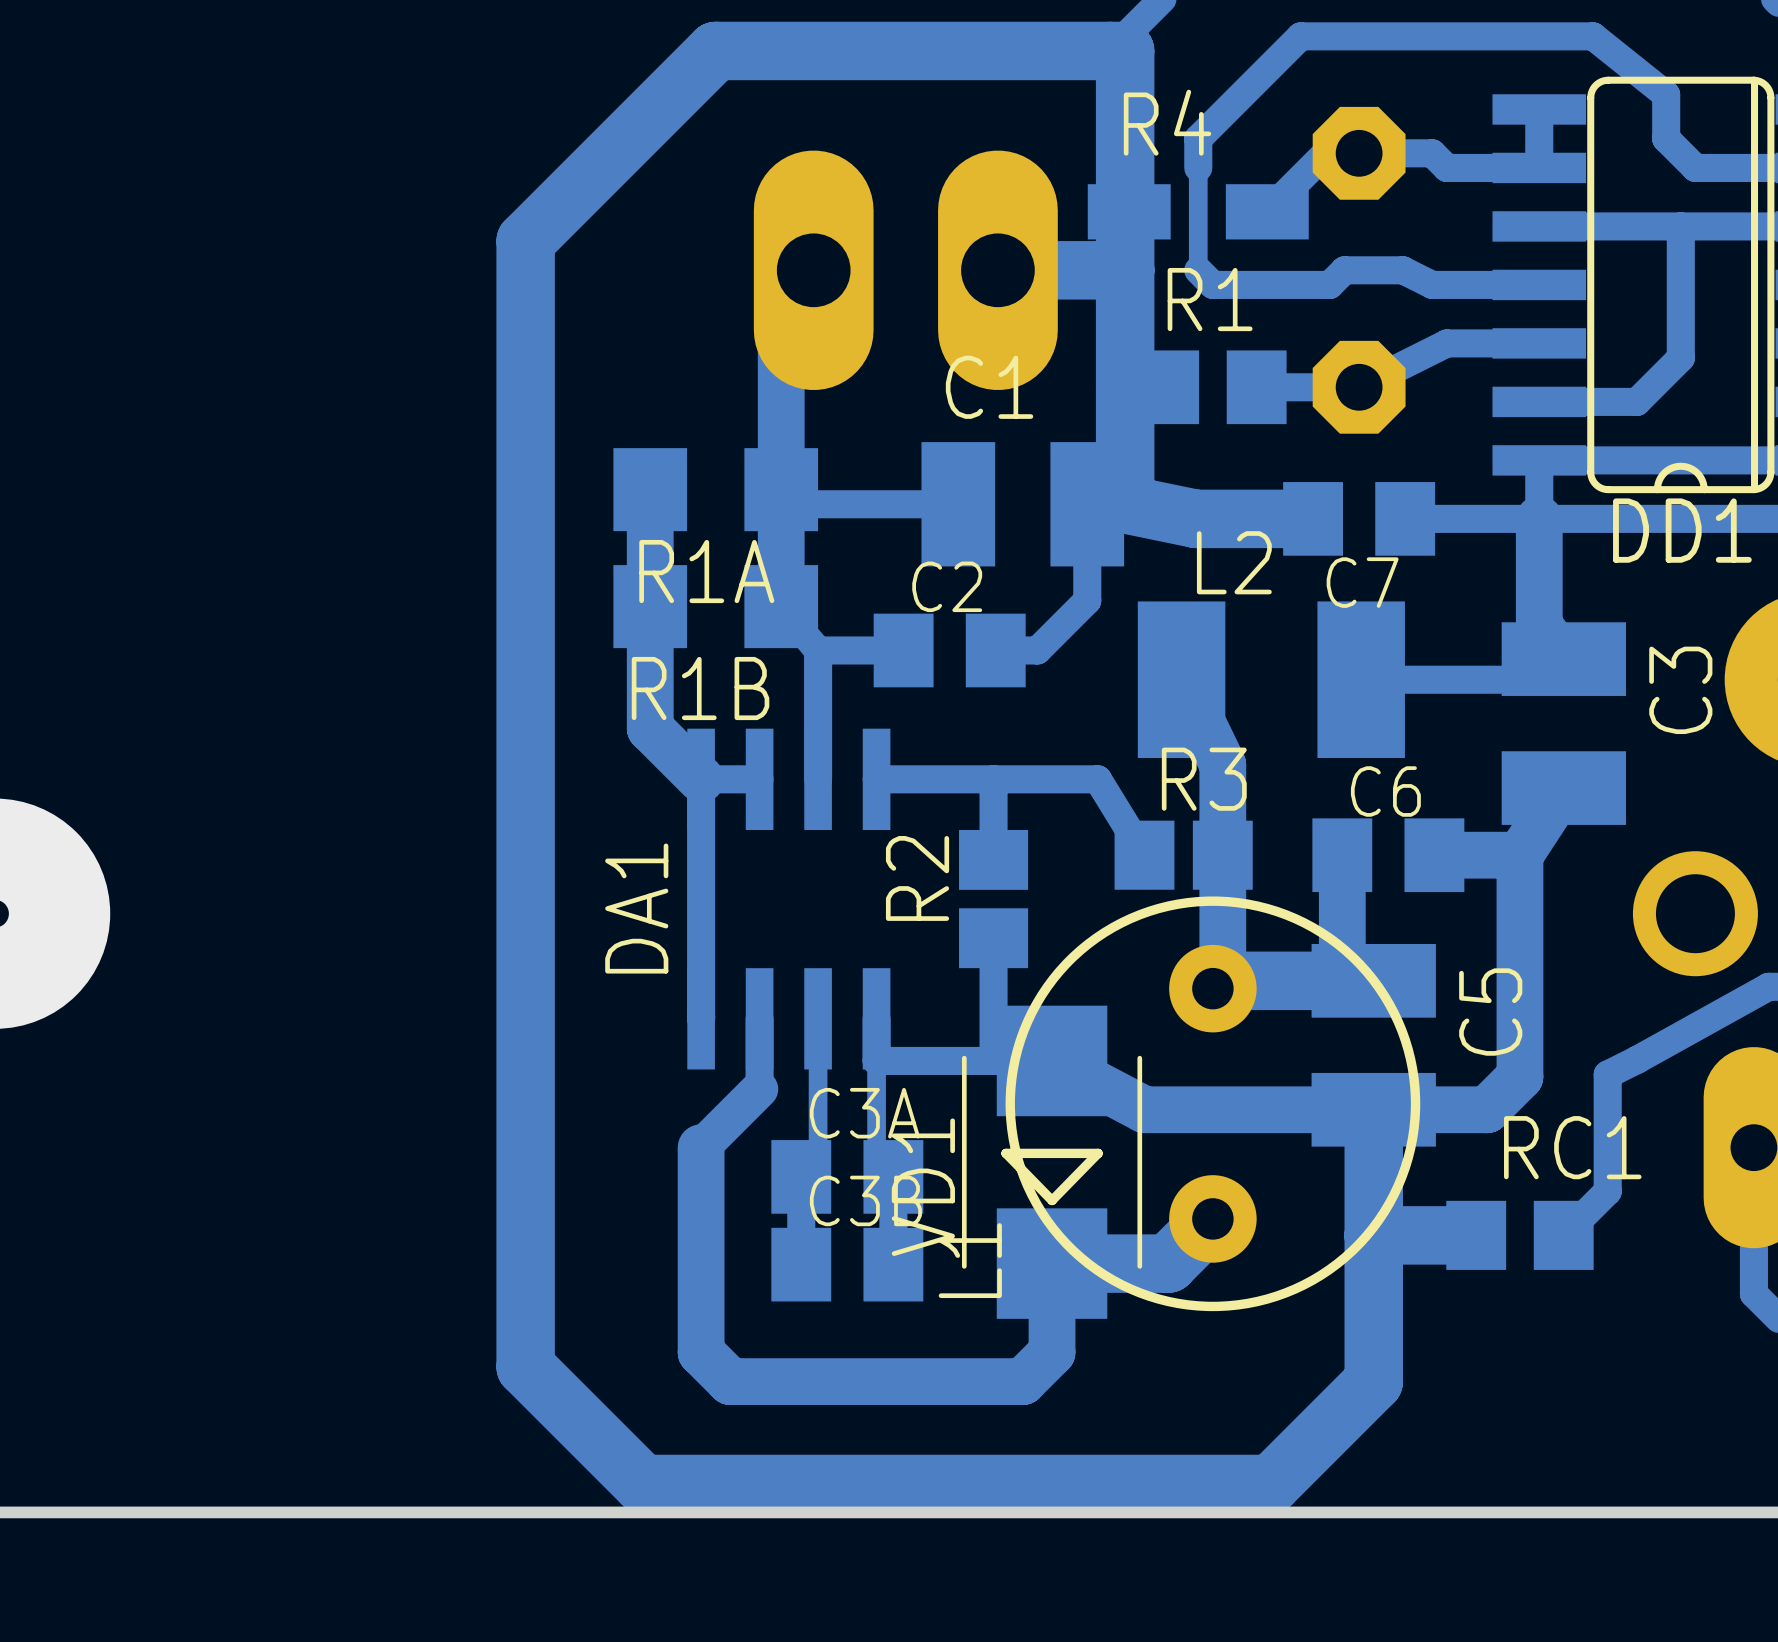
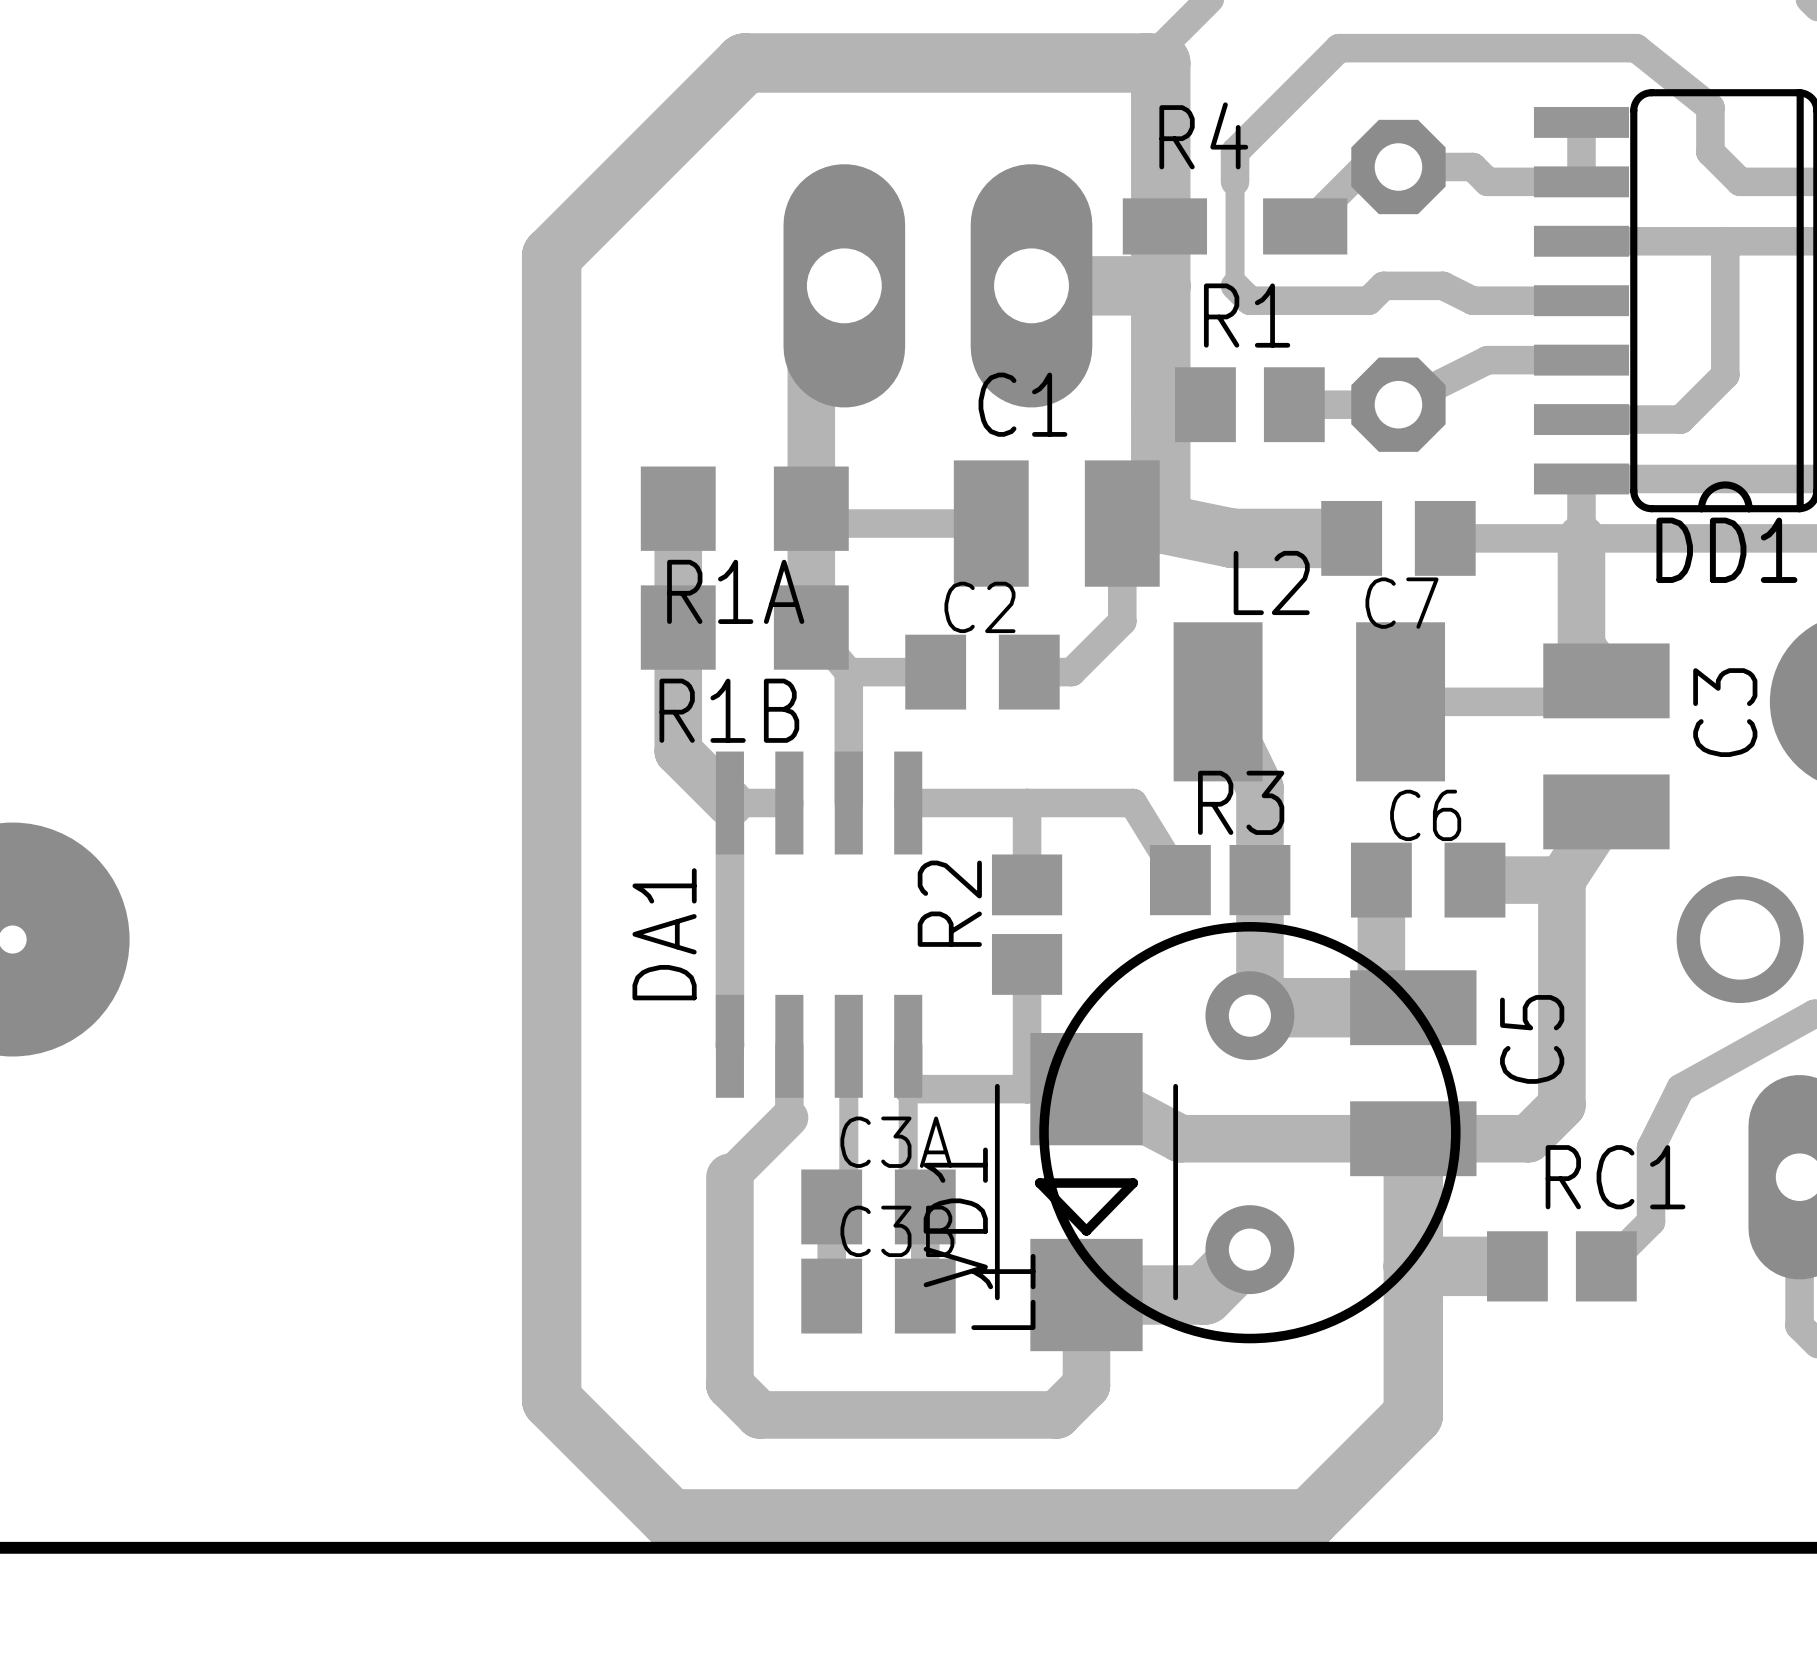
track: (1636, 1059) (1607, 1074) (1607, 1118) -> (1680, 1088) (1651, 1147)

